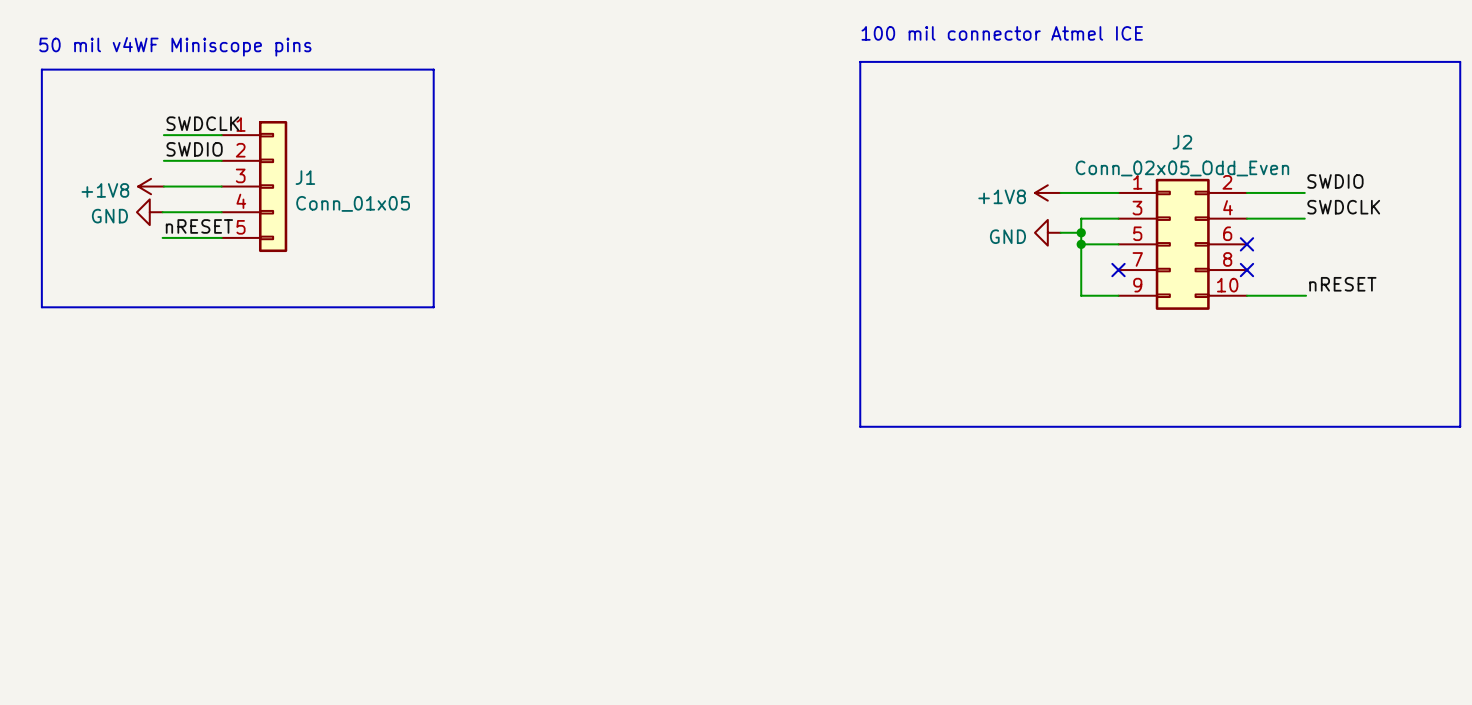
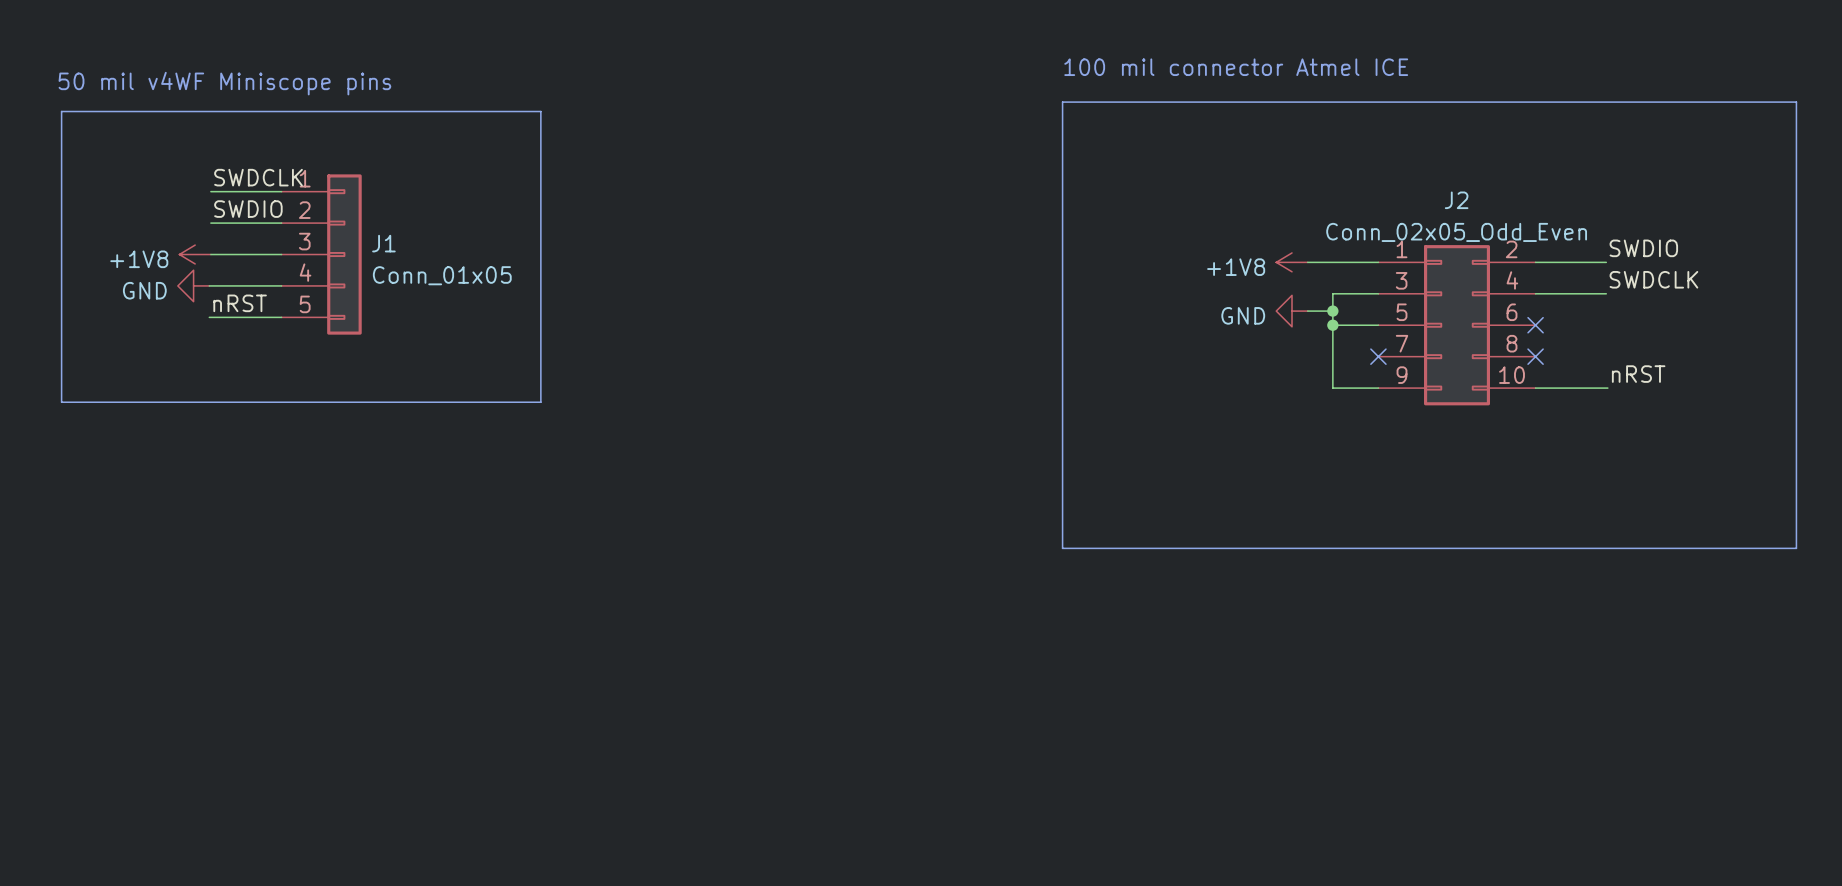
label: nRESET (199, 226) -> nRST (240, 303)
label: nRESET (1342, 284) -> nRST (1638, 374)

